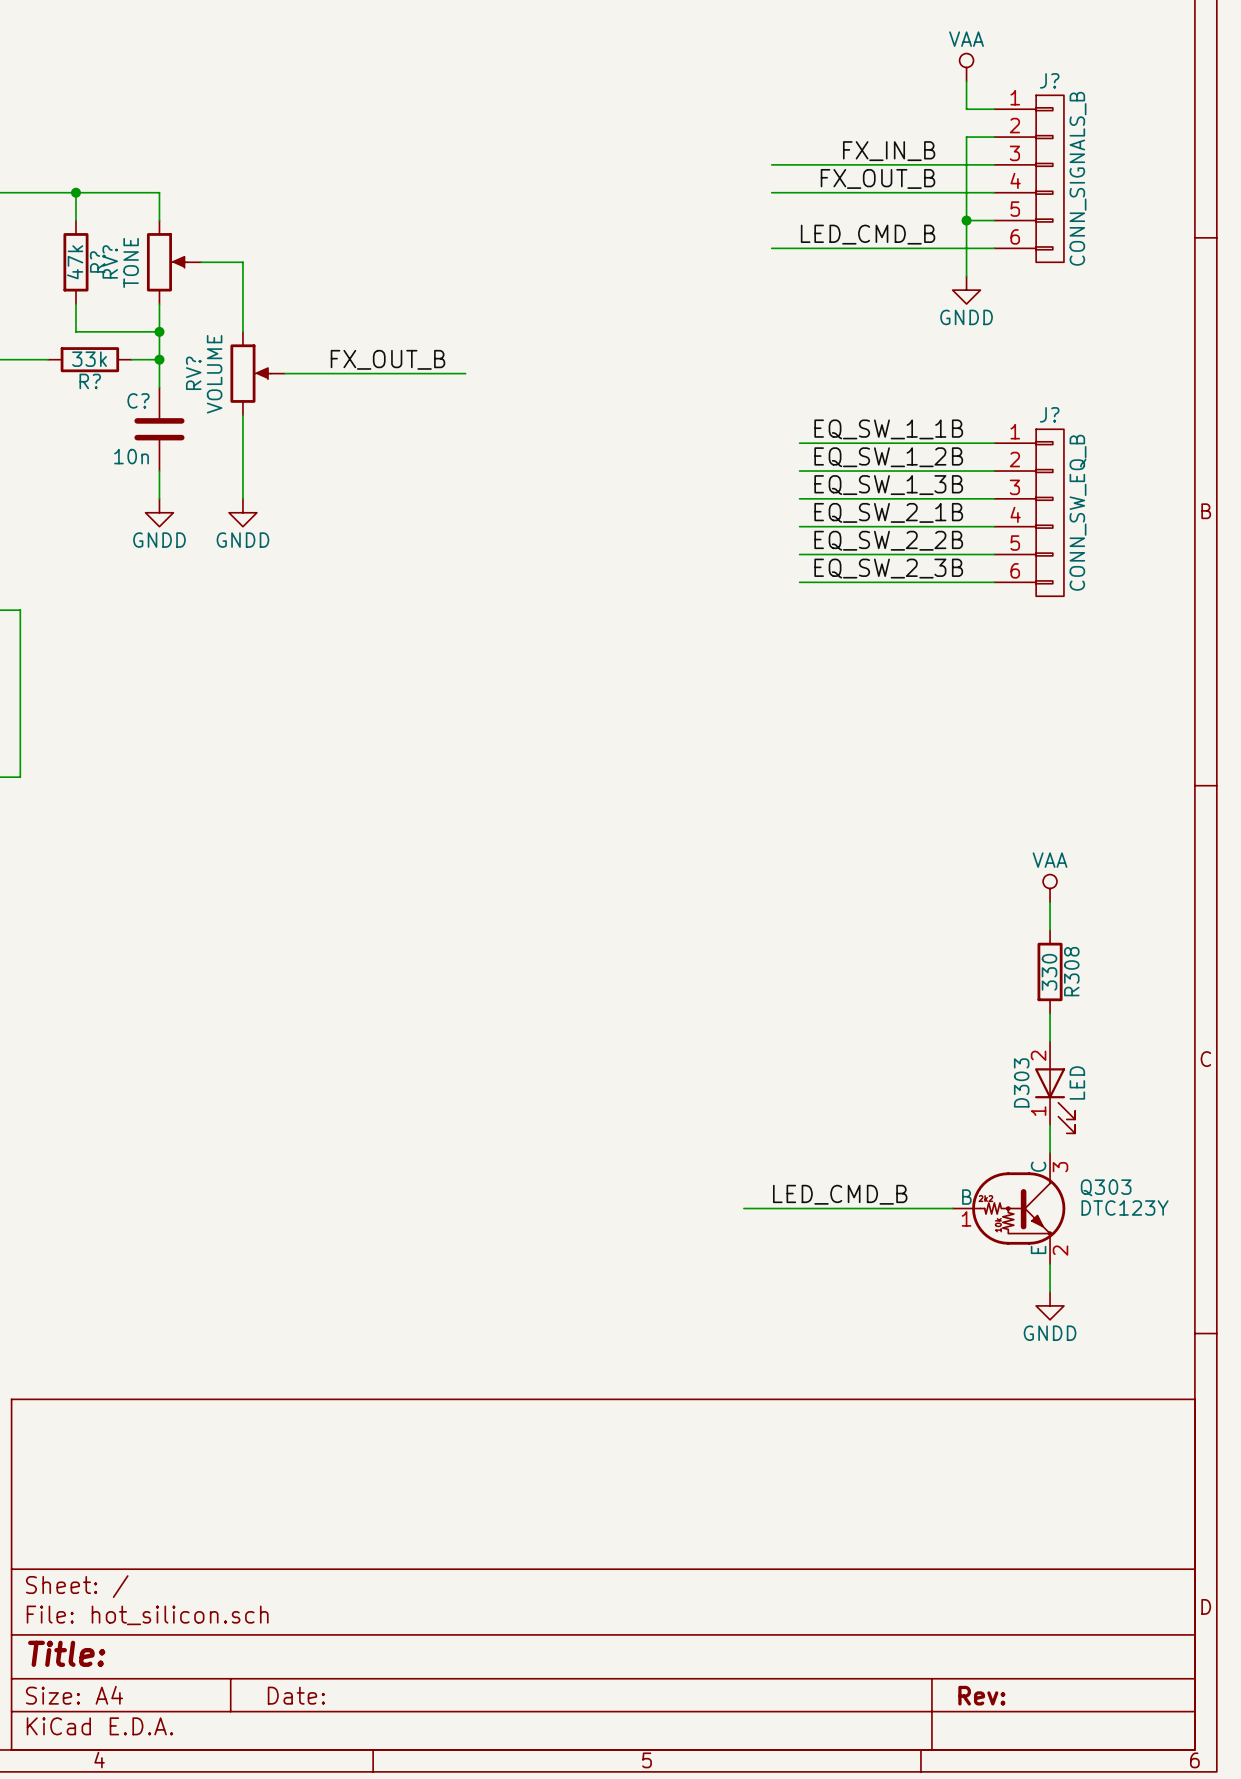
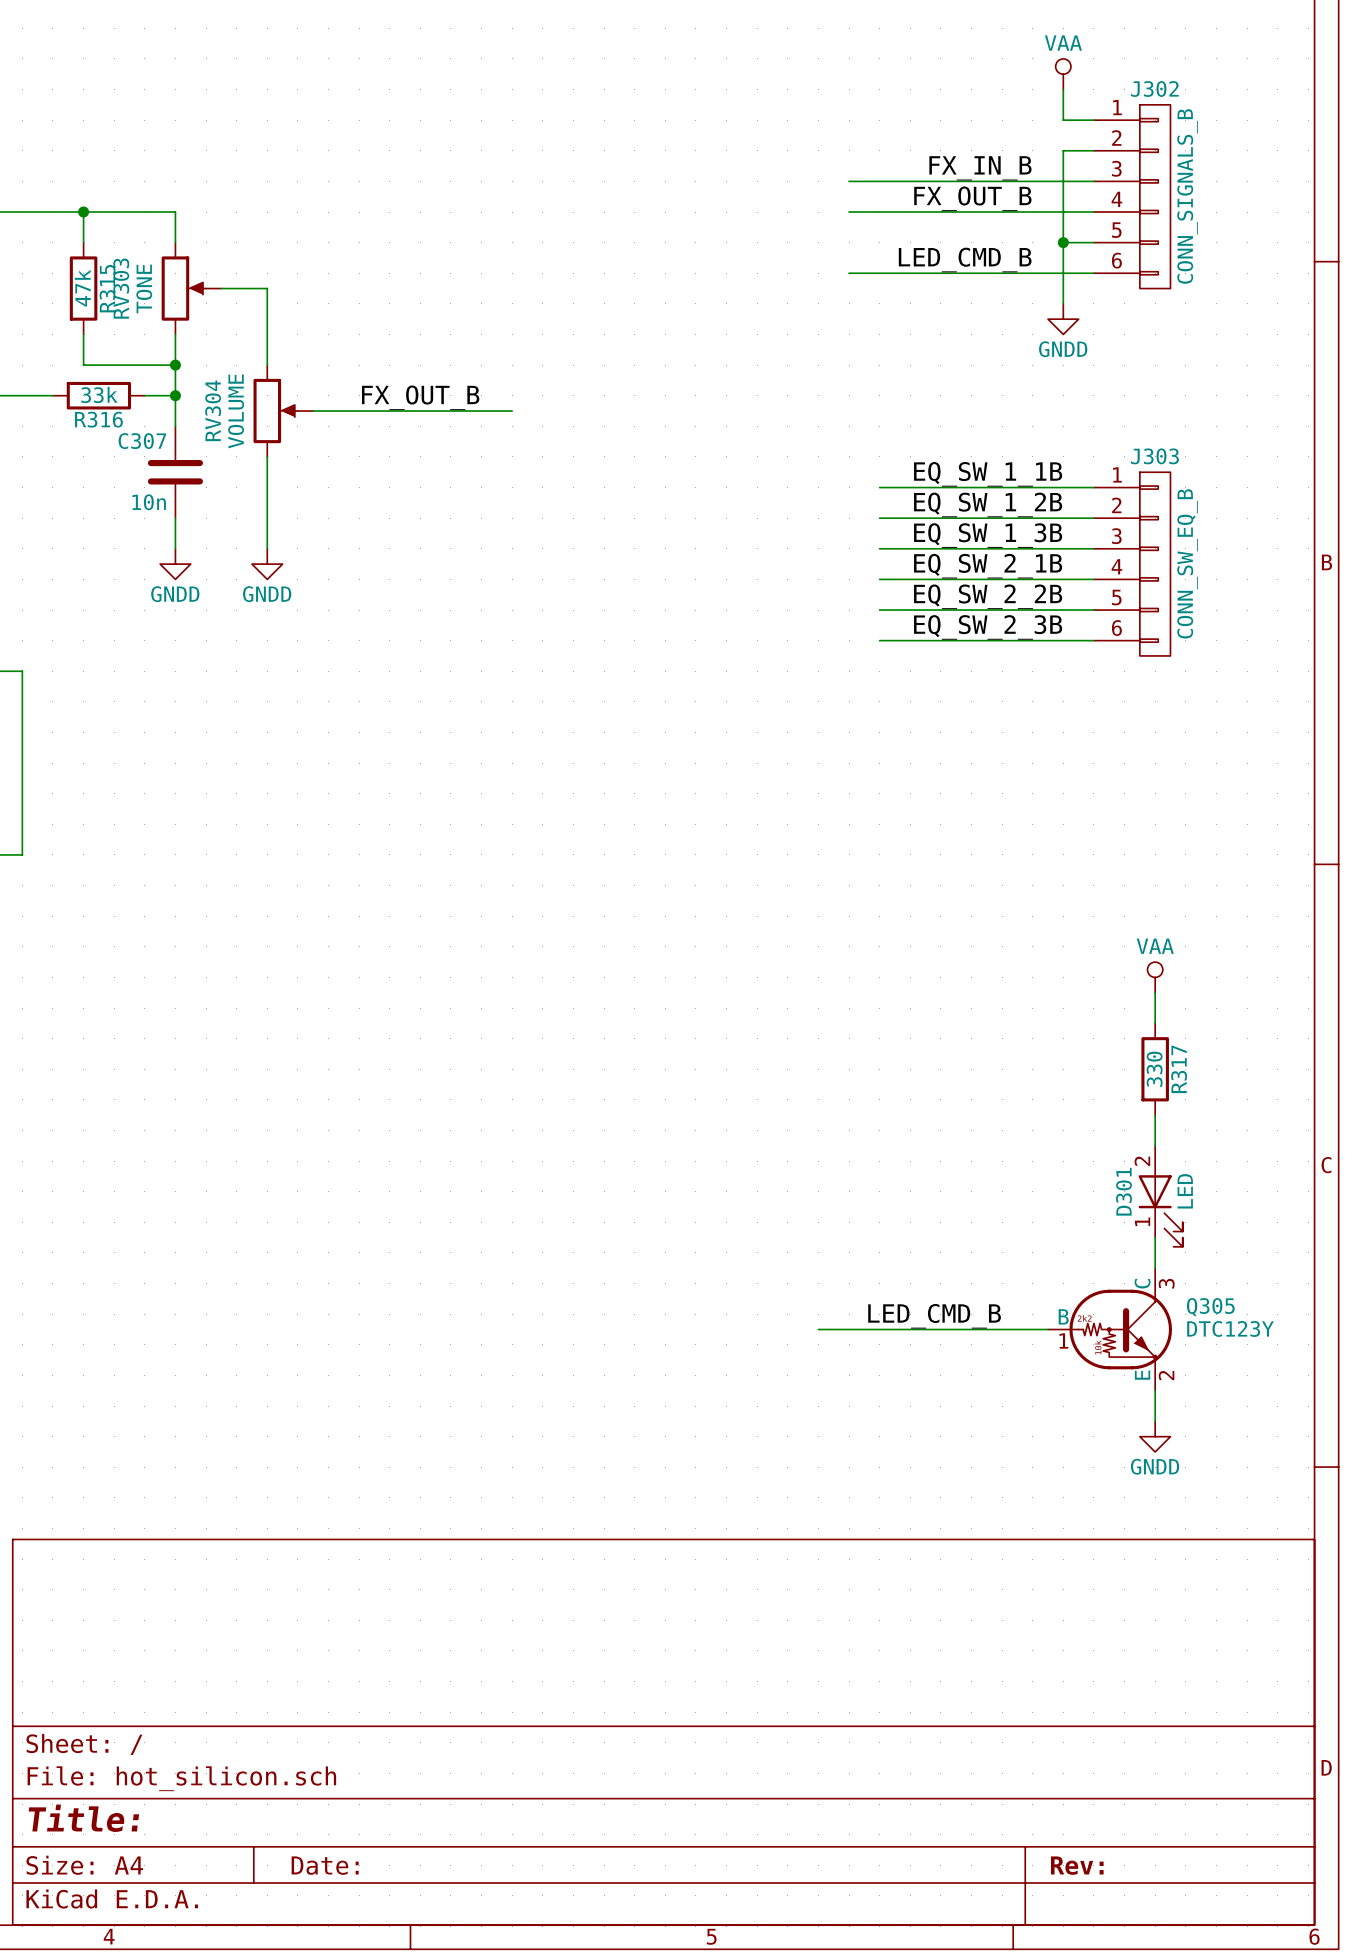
J? name: J? (1049, 80) -> J302 (1154, 88)
R? name: R? (97, 261) -> R315 (107, 288)
RV? name: RV? (110, 261) -> RV303 (121, 288)
RV? name: RV? (193, 373) -> RV304 (213, 410)
R? name: R? (90, 381) -> R316 (98, 419)
C? name: C? (138, 400) -> C307 (142, 441)
J? name: J? (1049, 414) -> J303 (1154, 456)
R308 name: R308 (1071, 971) -> R317 (1179, 1069)
D303 name: D303 (1021, 1082) -> D301 (1123, 1191)
Q303 name: Q303 (1106, 1187) -> Q305 (1210, 1307)

